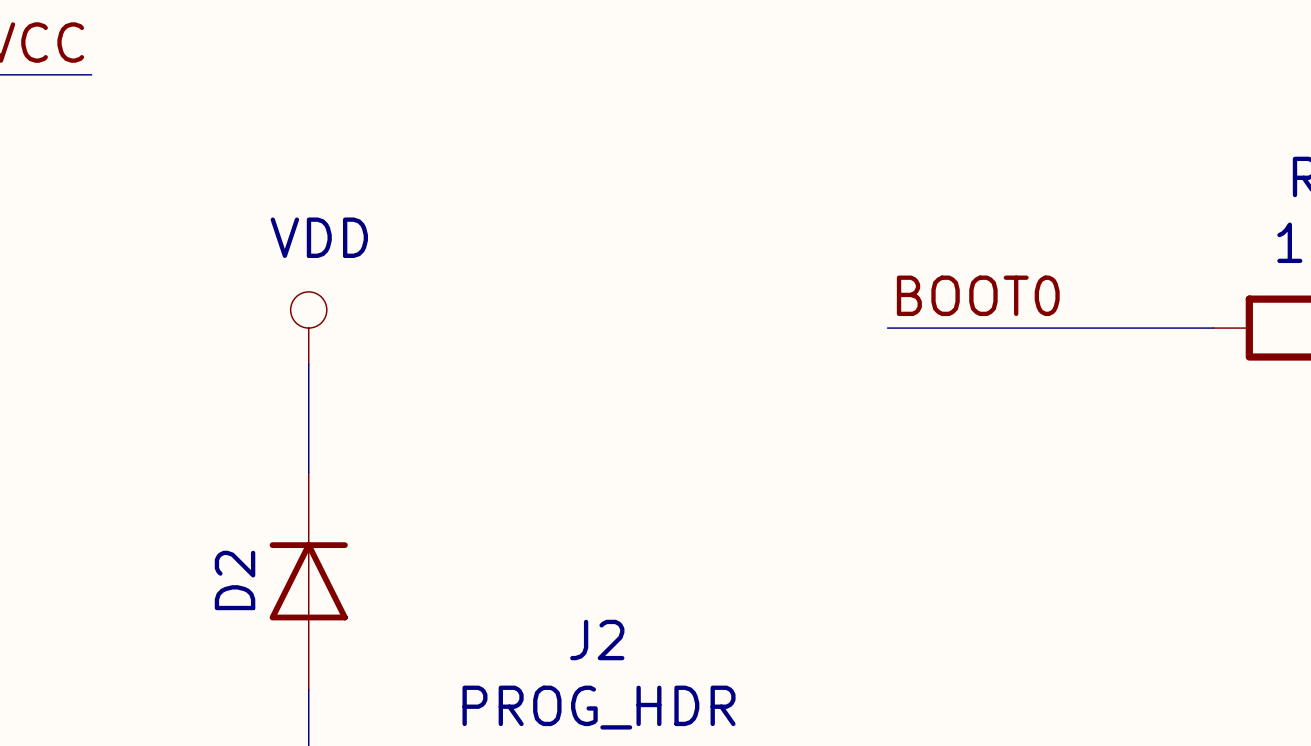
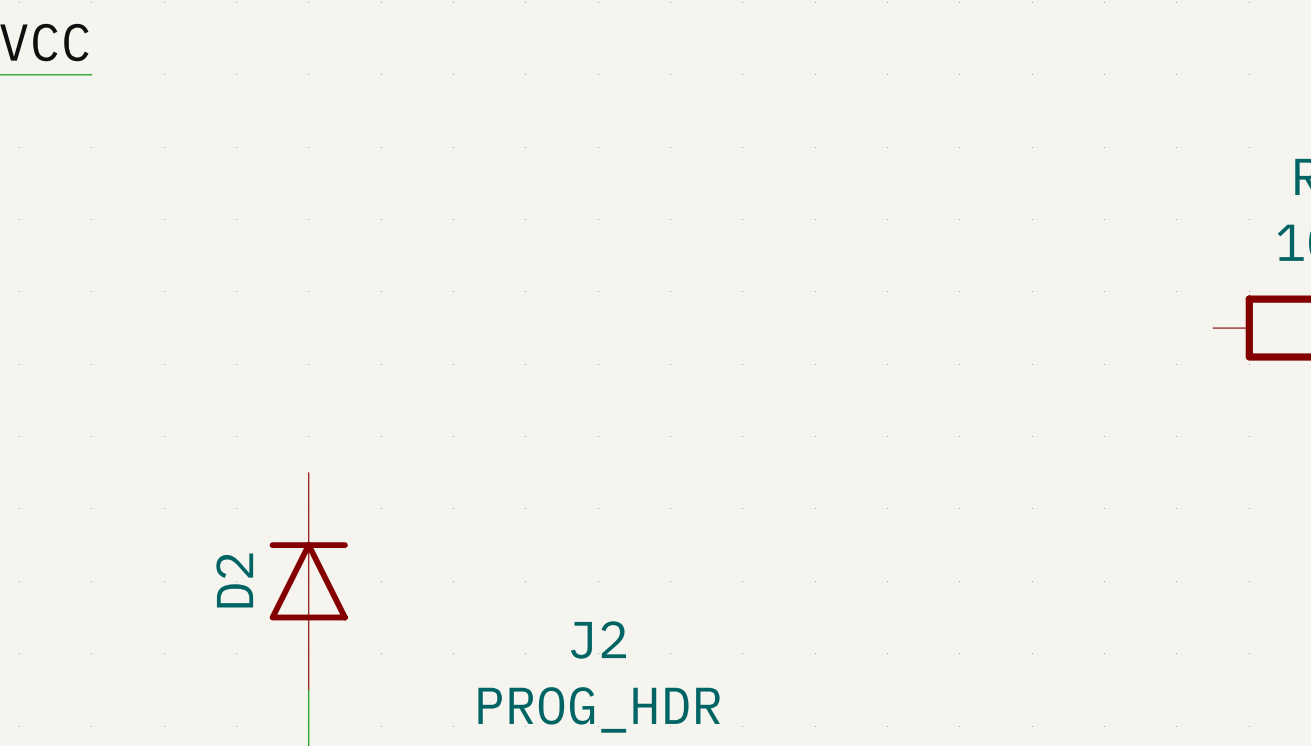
label: BOOT0 (978, 295) -> none
power symbol: VDD (308, 328) -> none
wire: (887, 328) (1213, 328) -> none
wire: (308, 364) (308, 472) -> none

